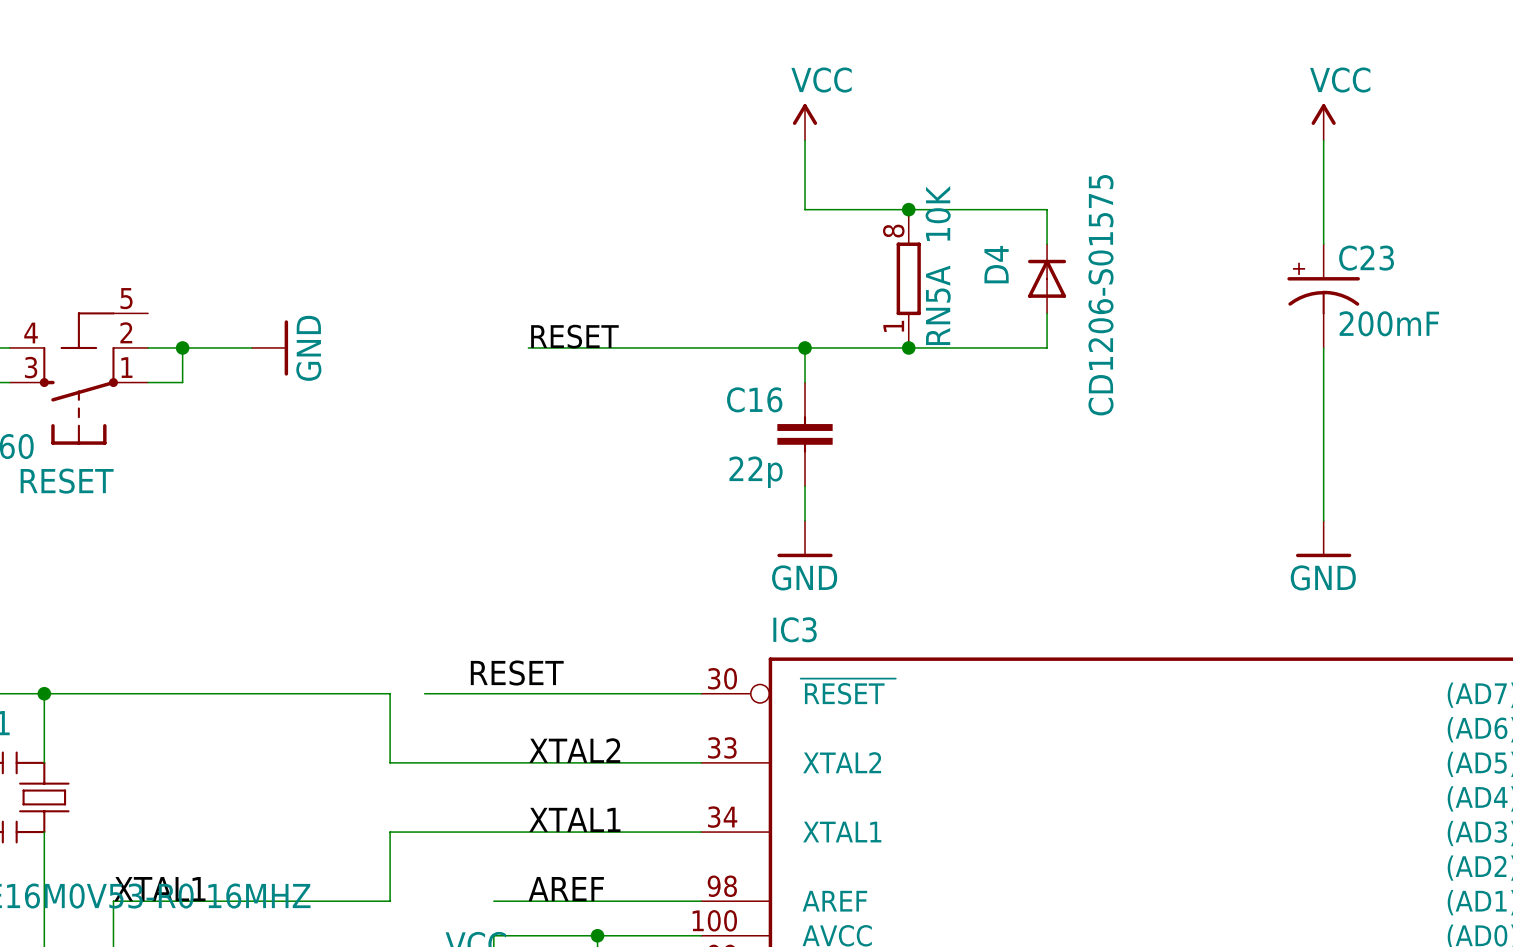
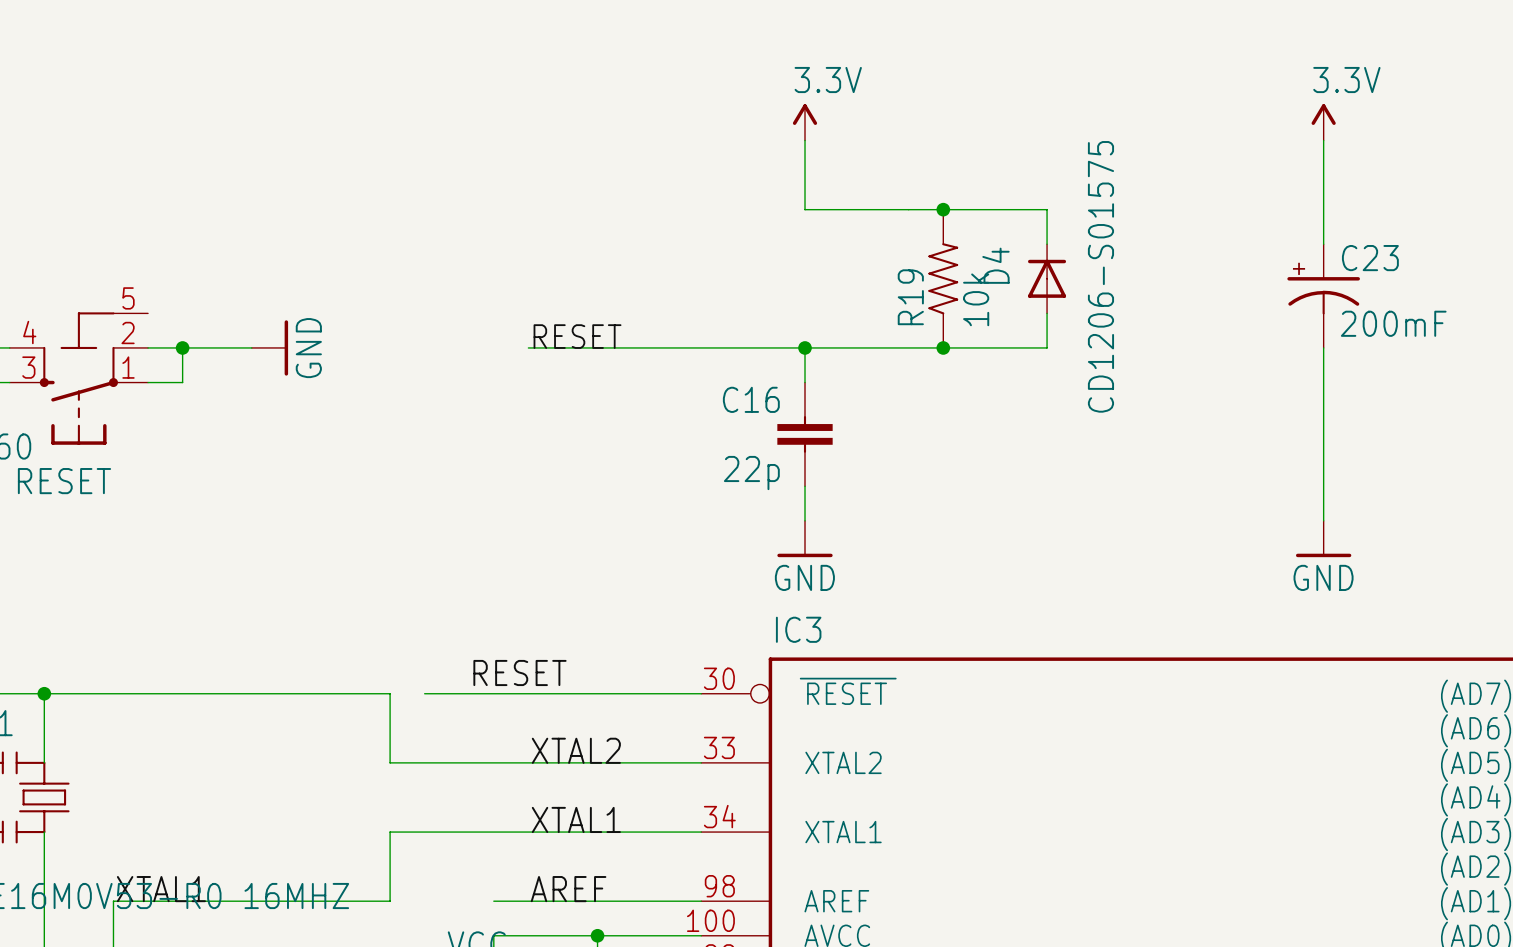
power symbol: VCC (805, 122) -> 3.3V (805, 122)
power symbol: VCC (1323, 122) -> 3.3V (1323, 122)
junction position: (908, 209) -> (943, 209)
RN5A: 10K (908, 278) -> none
R19: none -> 10k (943, 278)
junction position: (908, 347) -> (943, 347)

